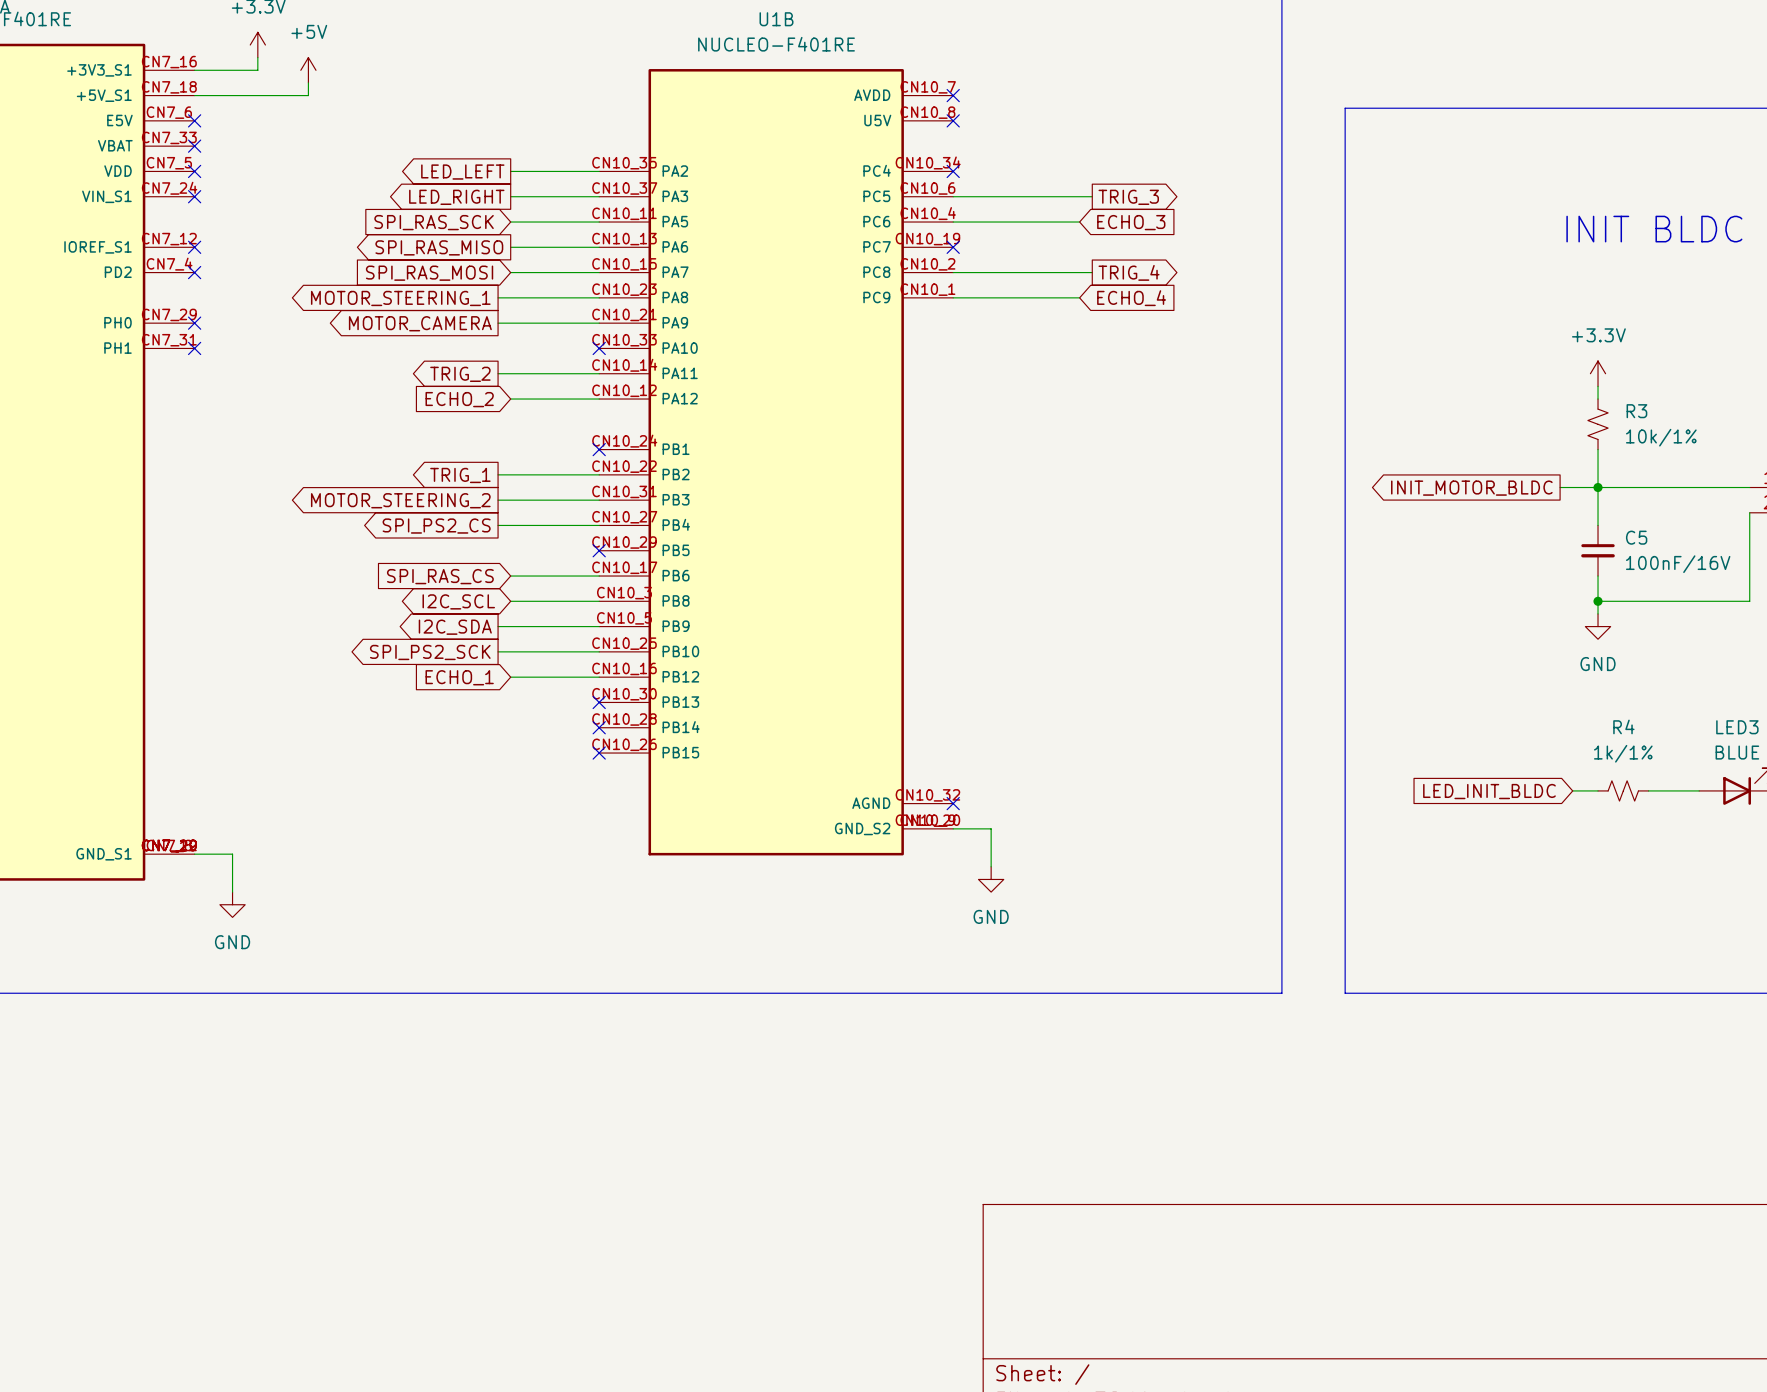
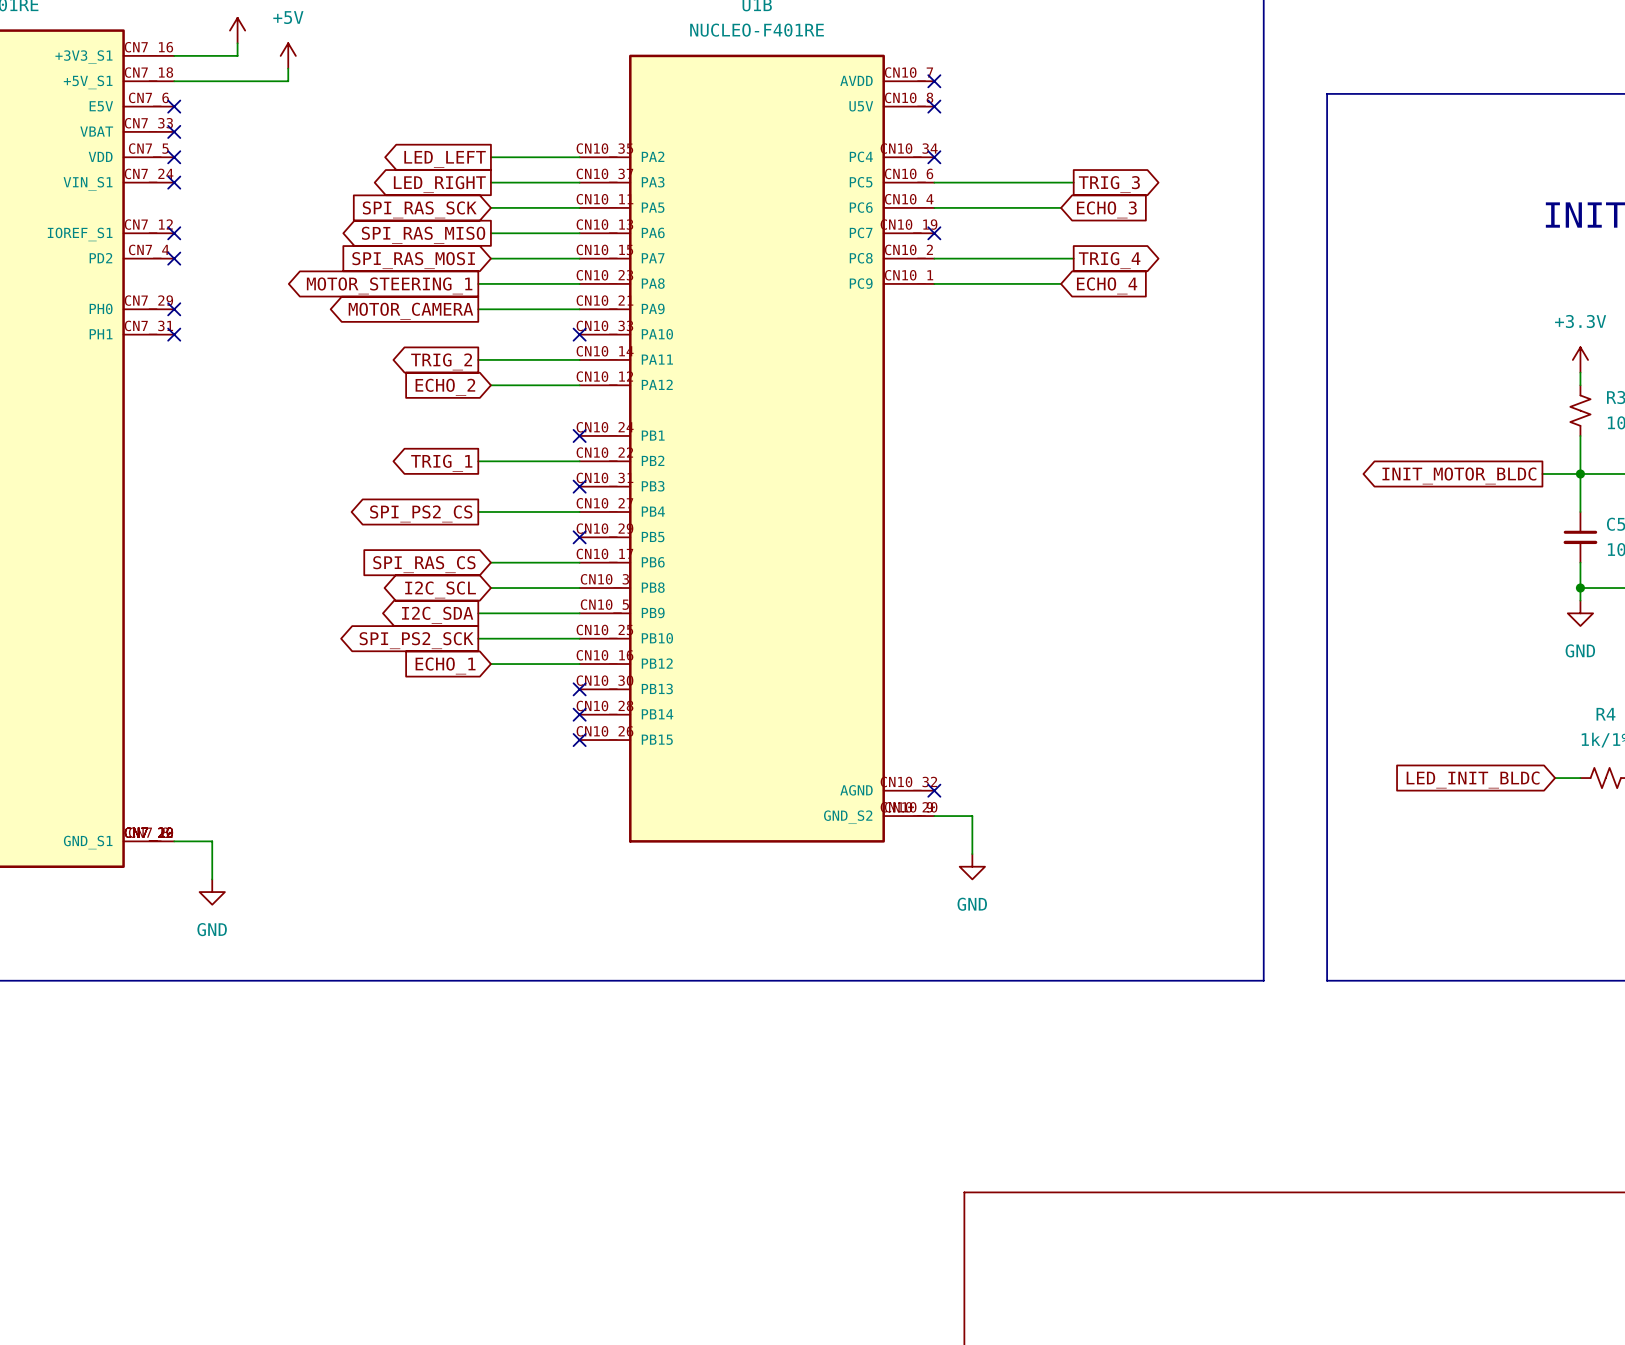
global label: MOTOR_STEERING_2 (400, 500) -> none
wire: (498, 500) (599, 500) -> none
no-connect mark: none -> (579, 486)

